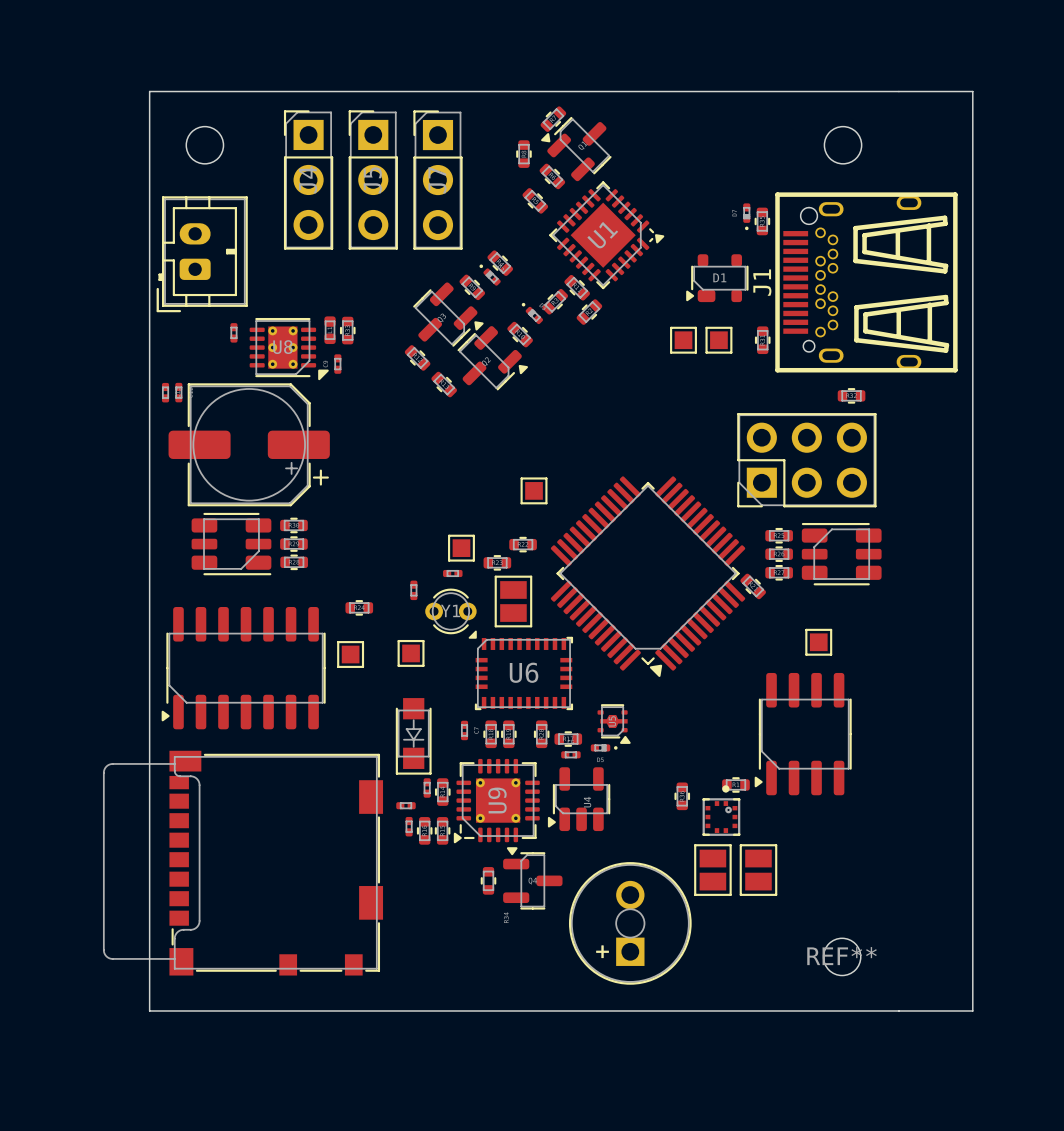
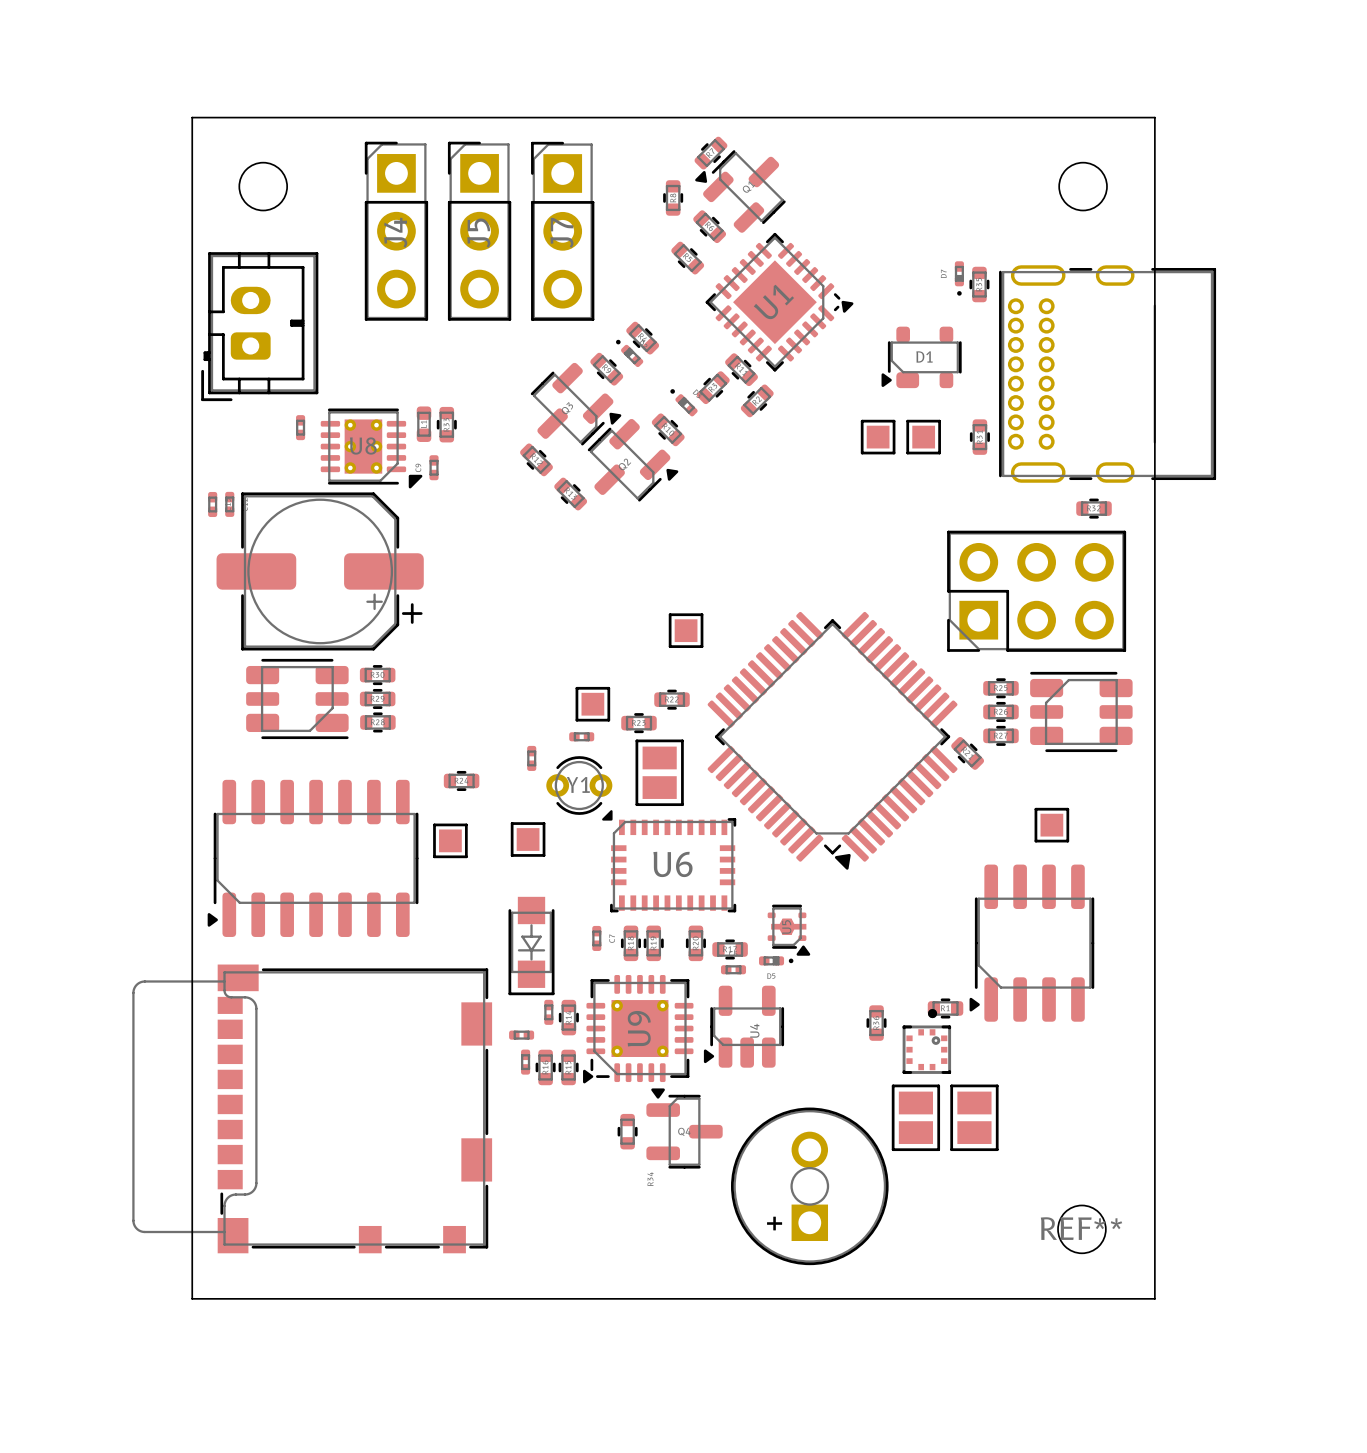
board edge: (898, 91) (972, 91) (972, 1010) (898, 1010) -> (1154, 117) (1154, 1298)
J1: (866, 282) -> none
part: none -> (1107, 374)

